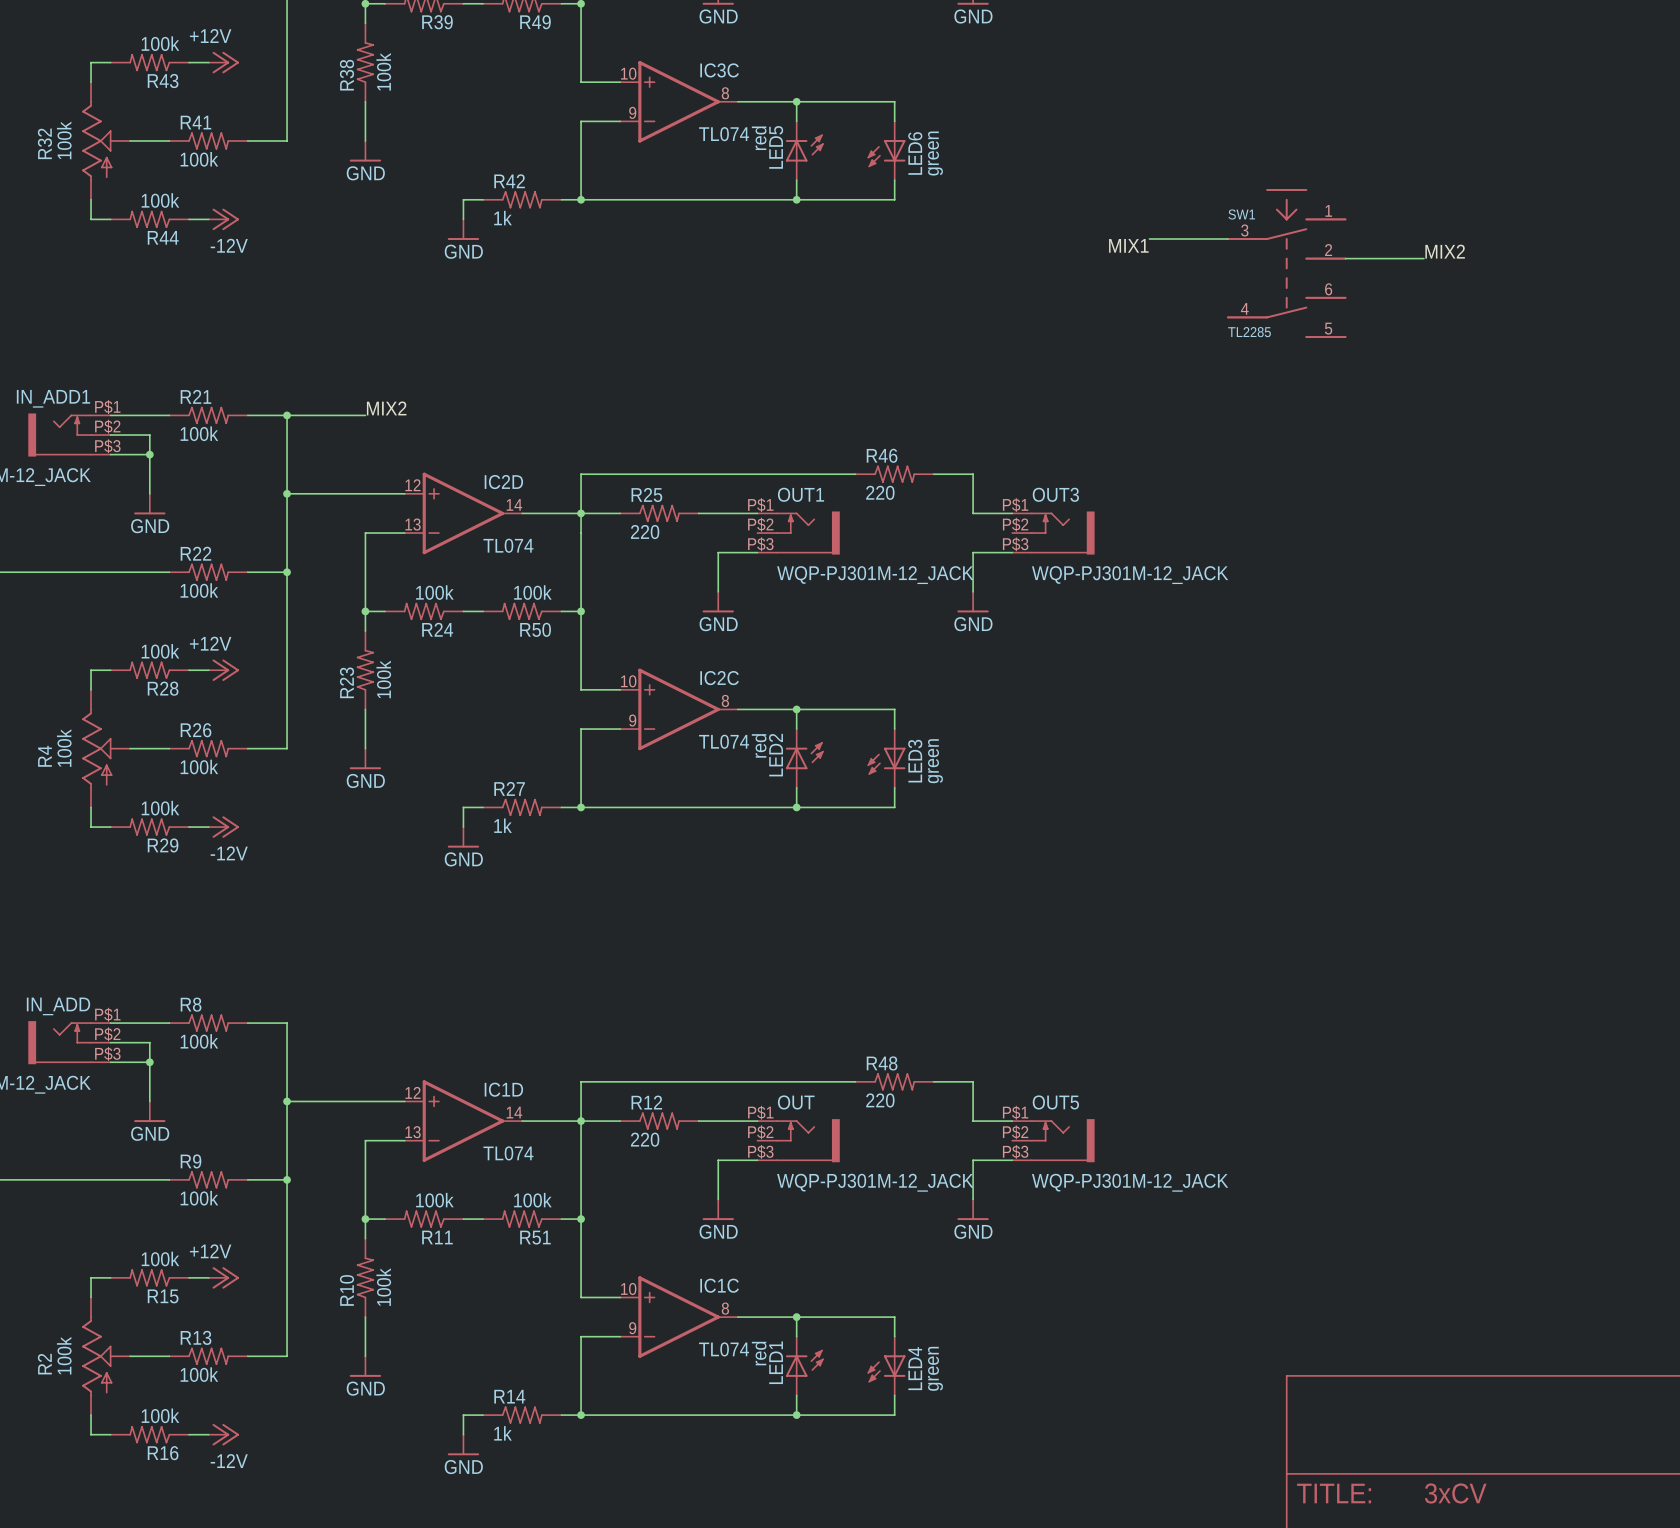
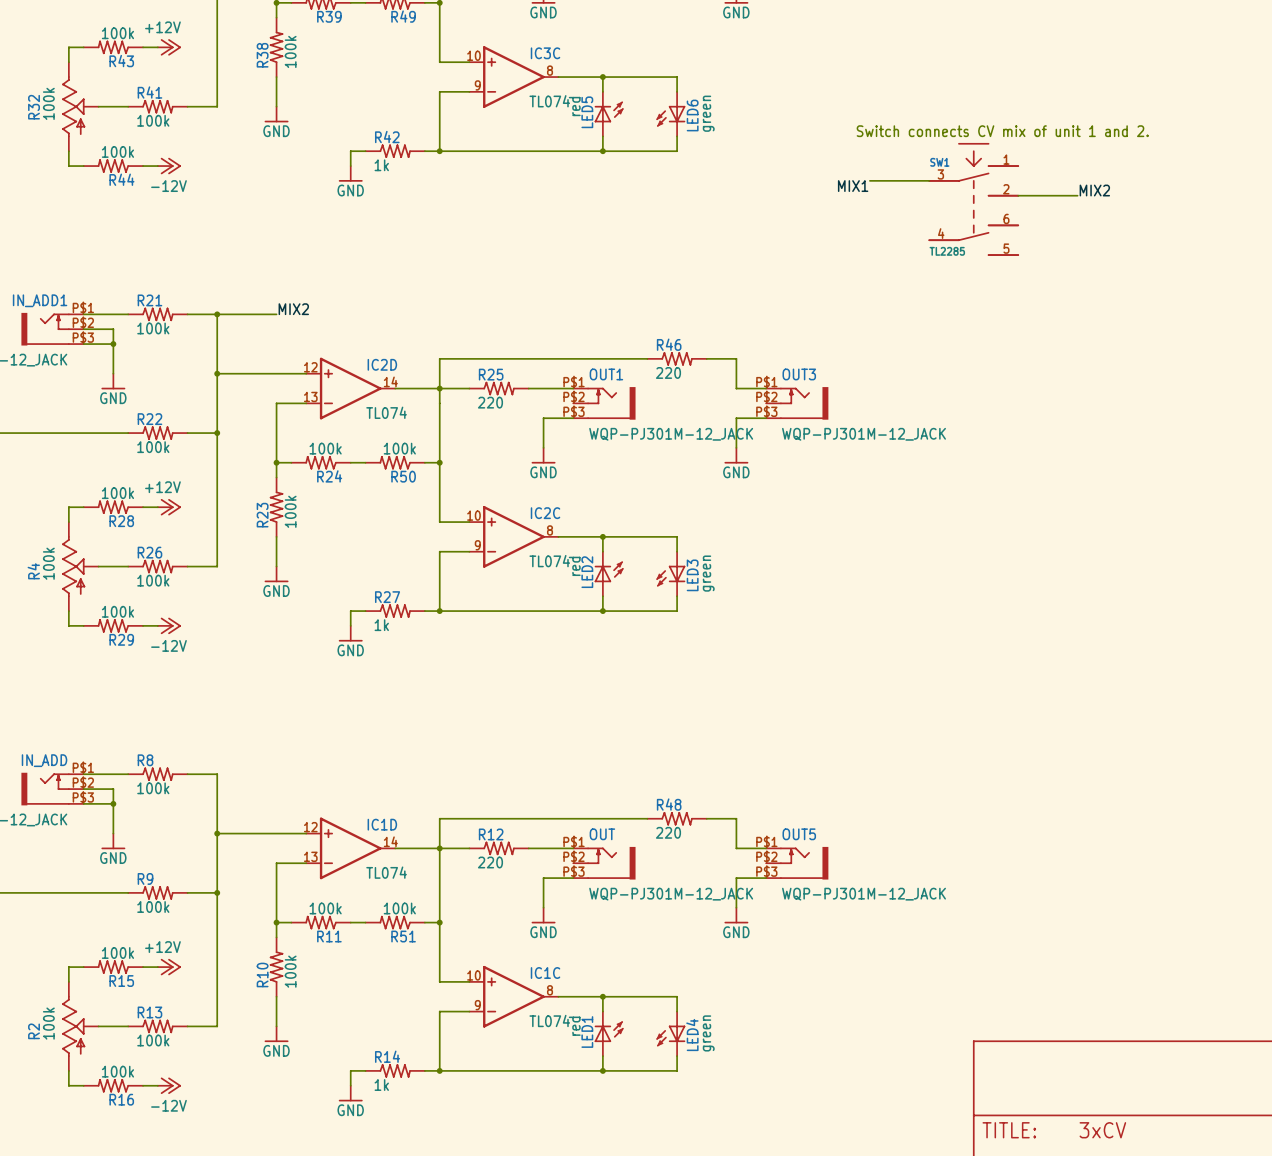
text: none -> Switch connects CV mix of unit 1 and 2. (1002, 131)

